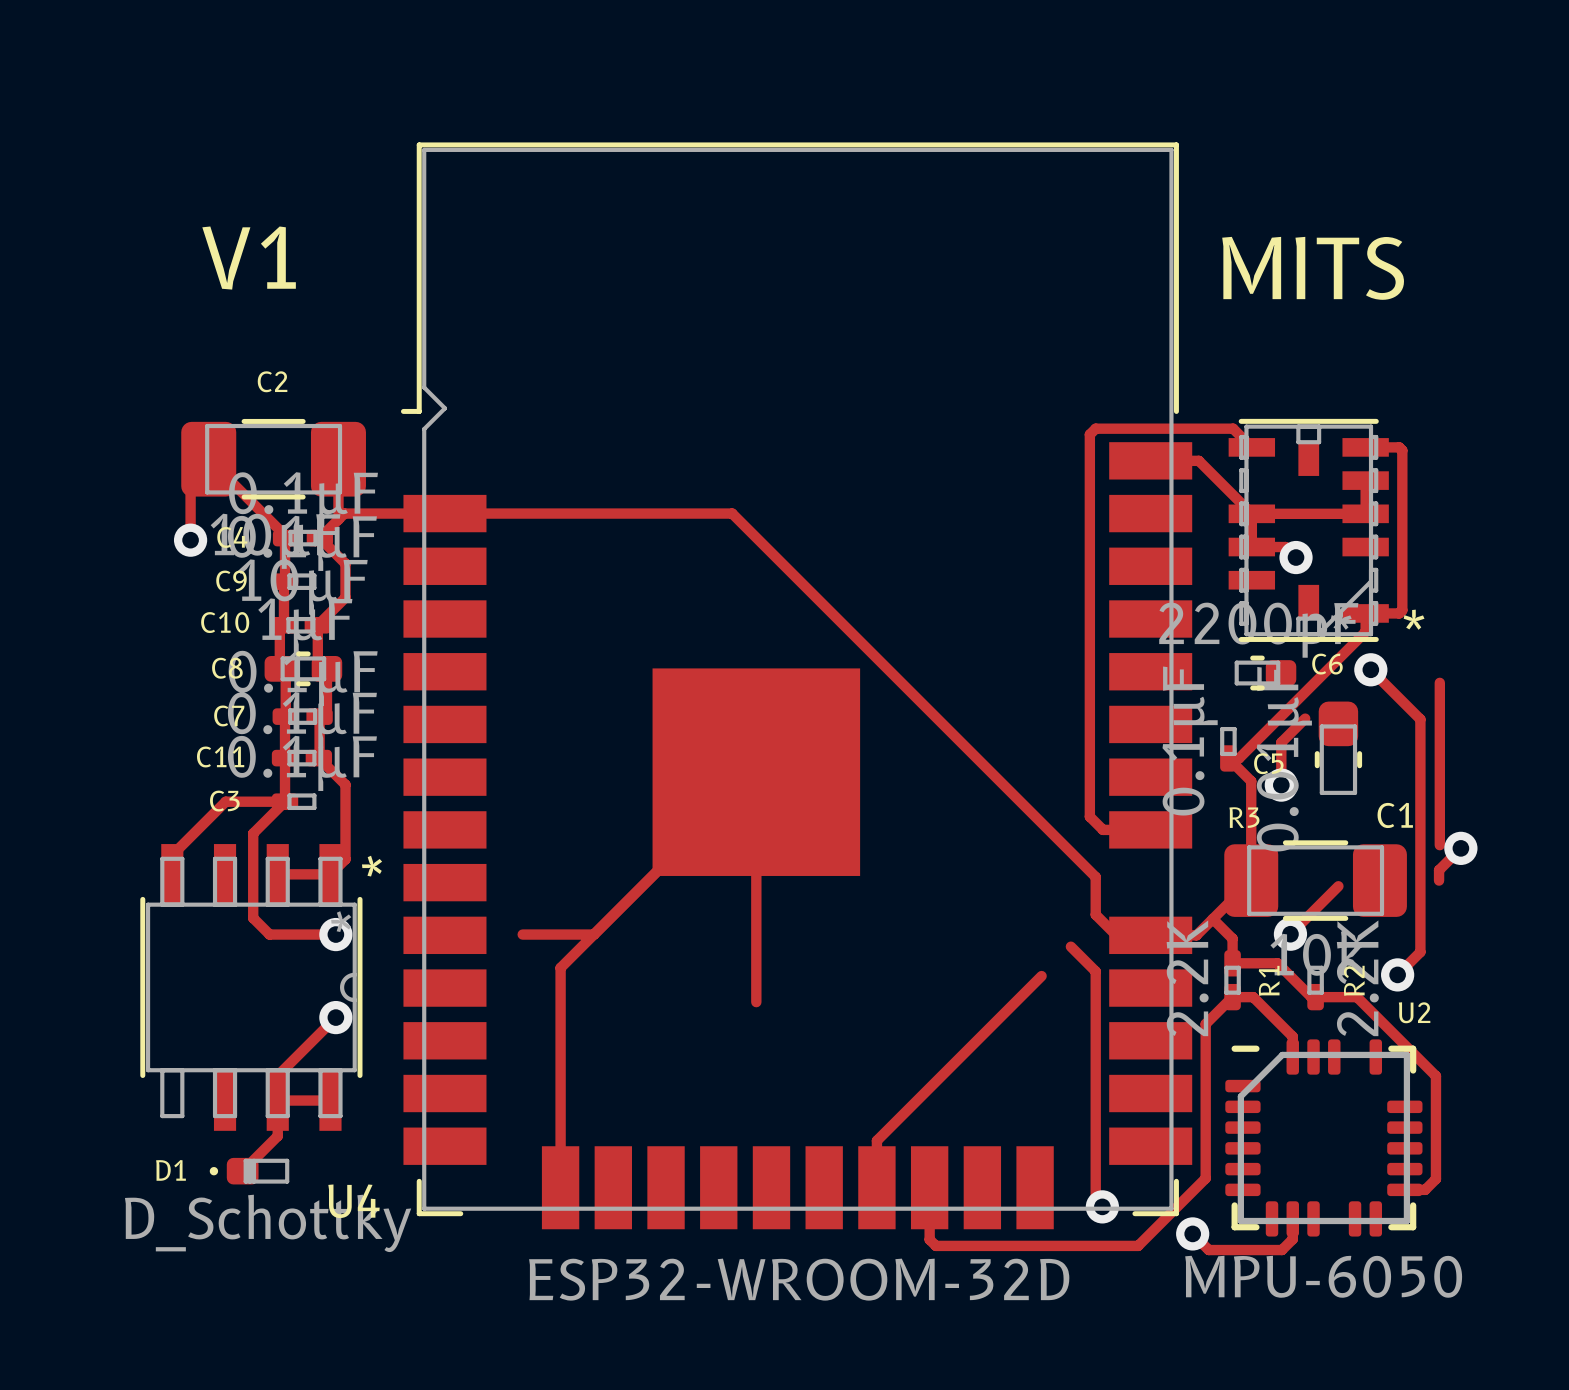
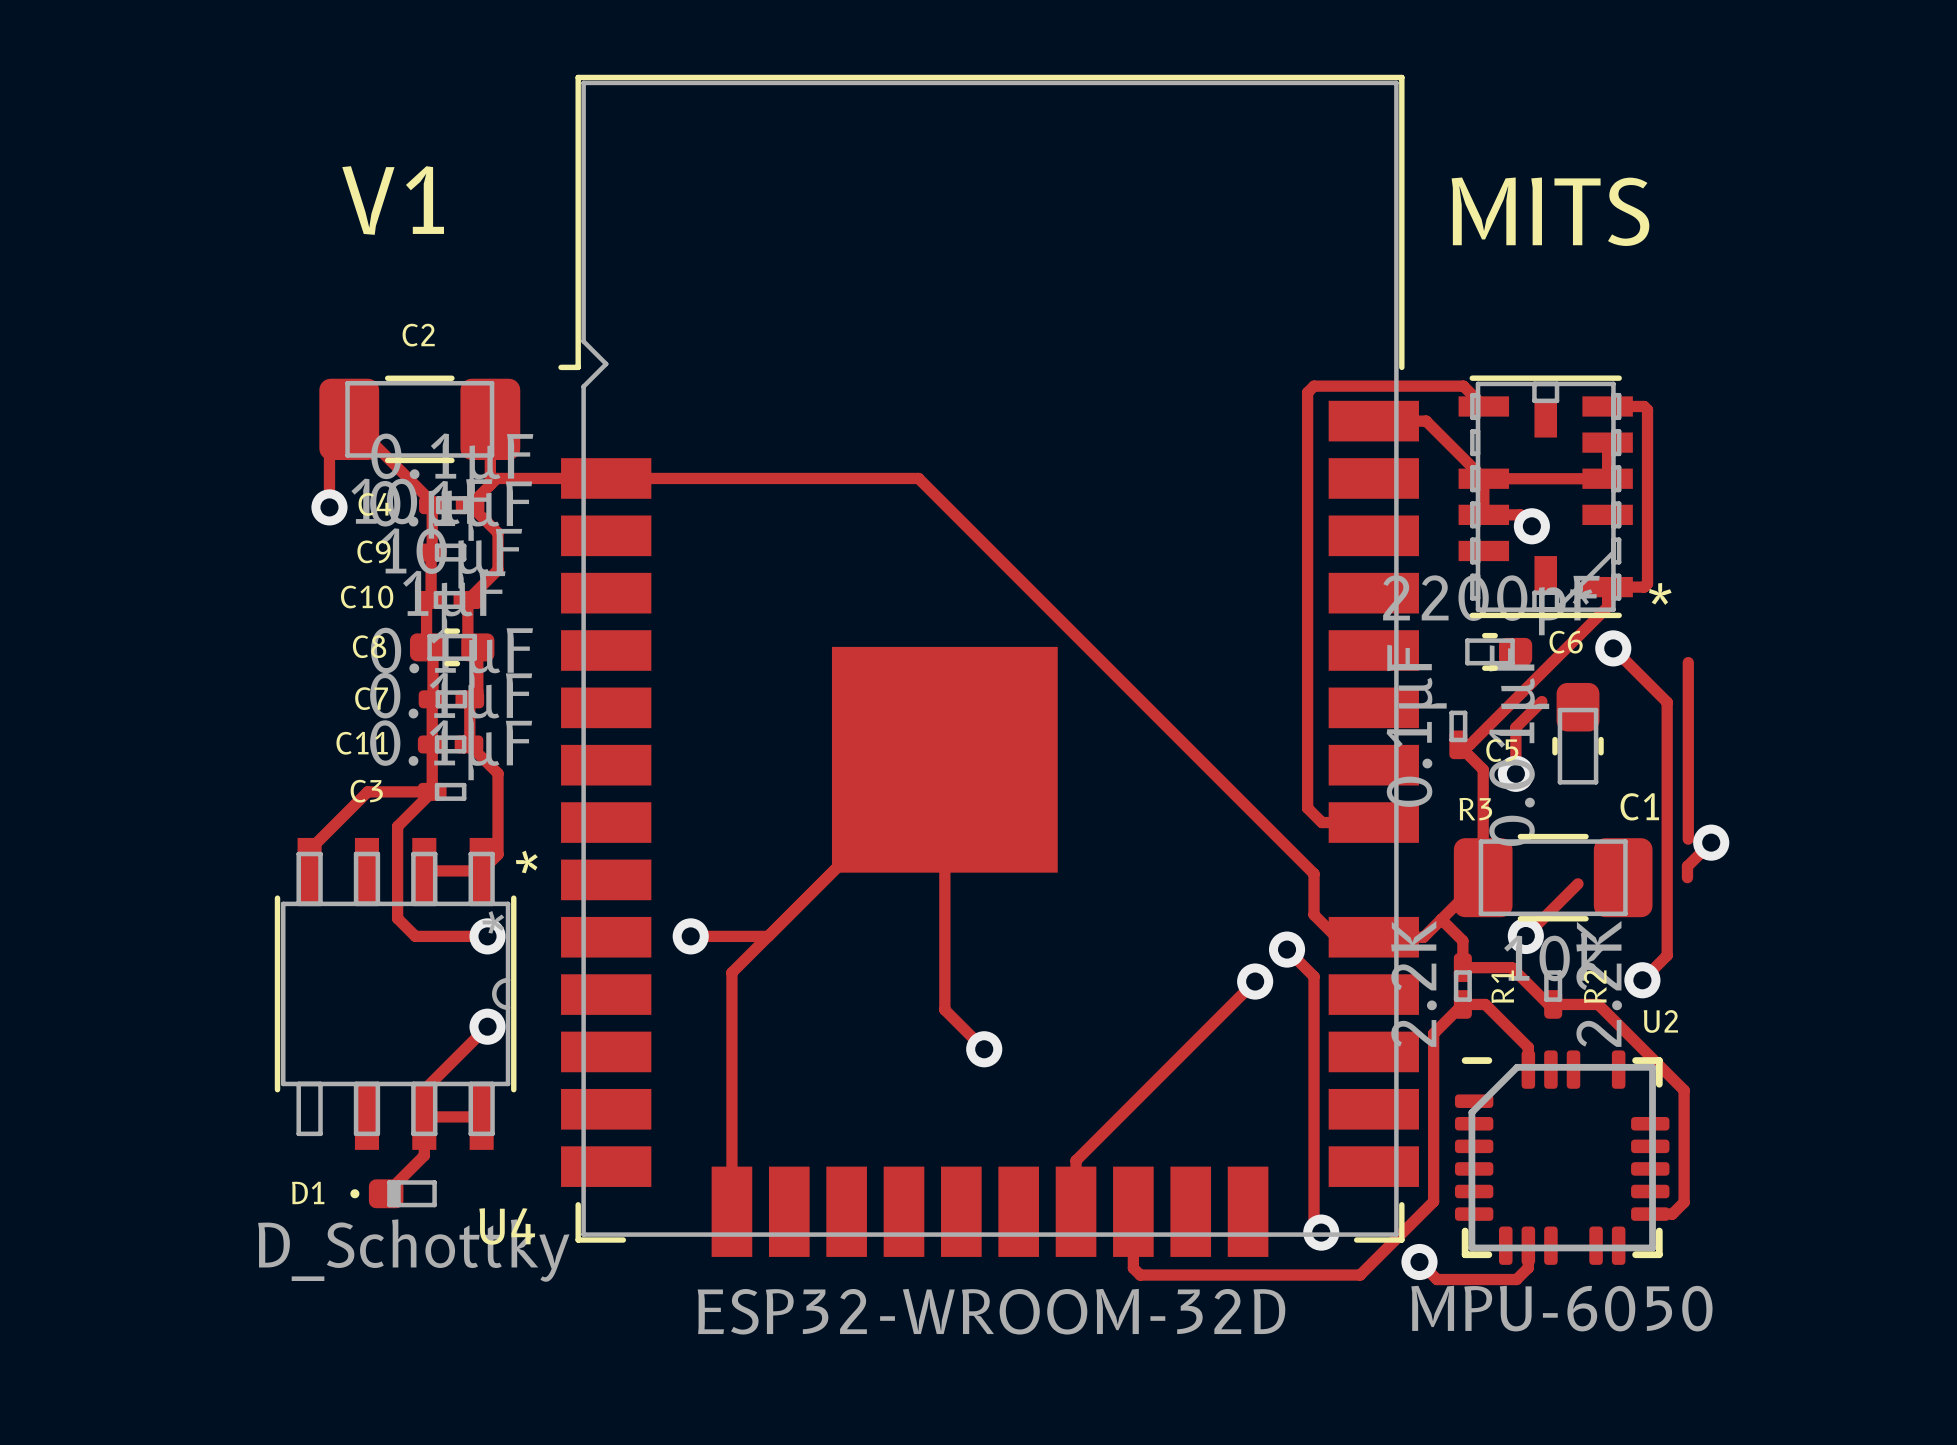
via: none -> (690, 936)
via: none -> (1287, 949)
via: none -> (1255, 981)
track: none -> (944, 1009) (984, 1049)
via: none -> (984, 1049)

